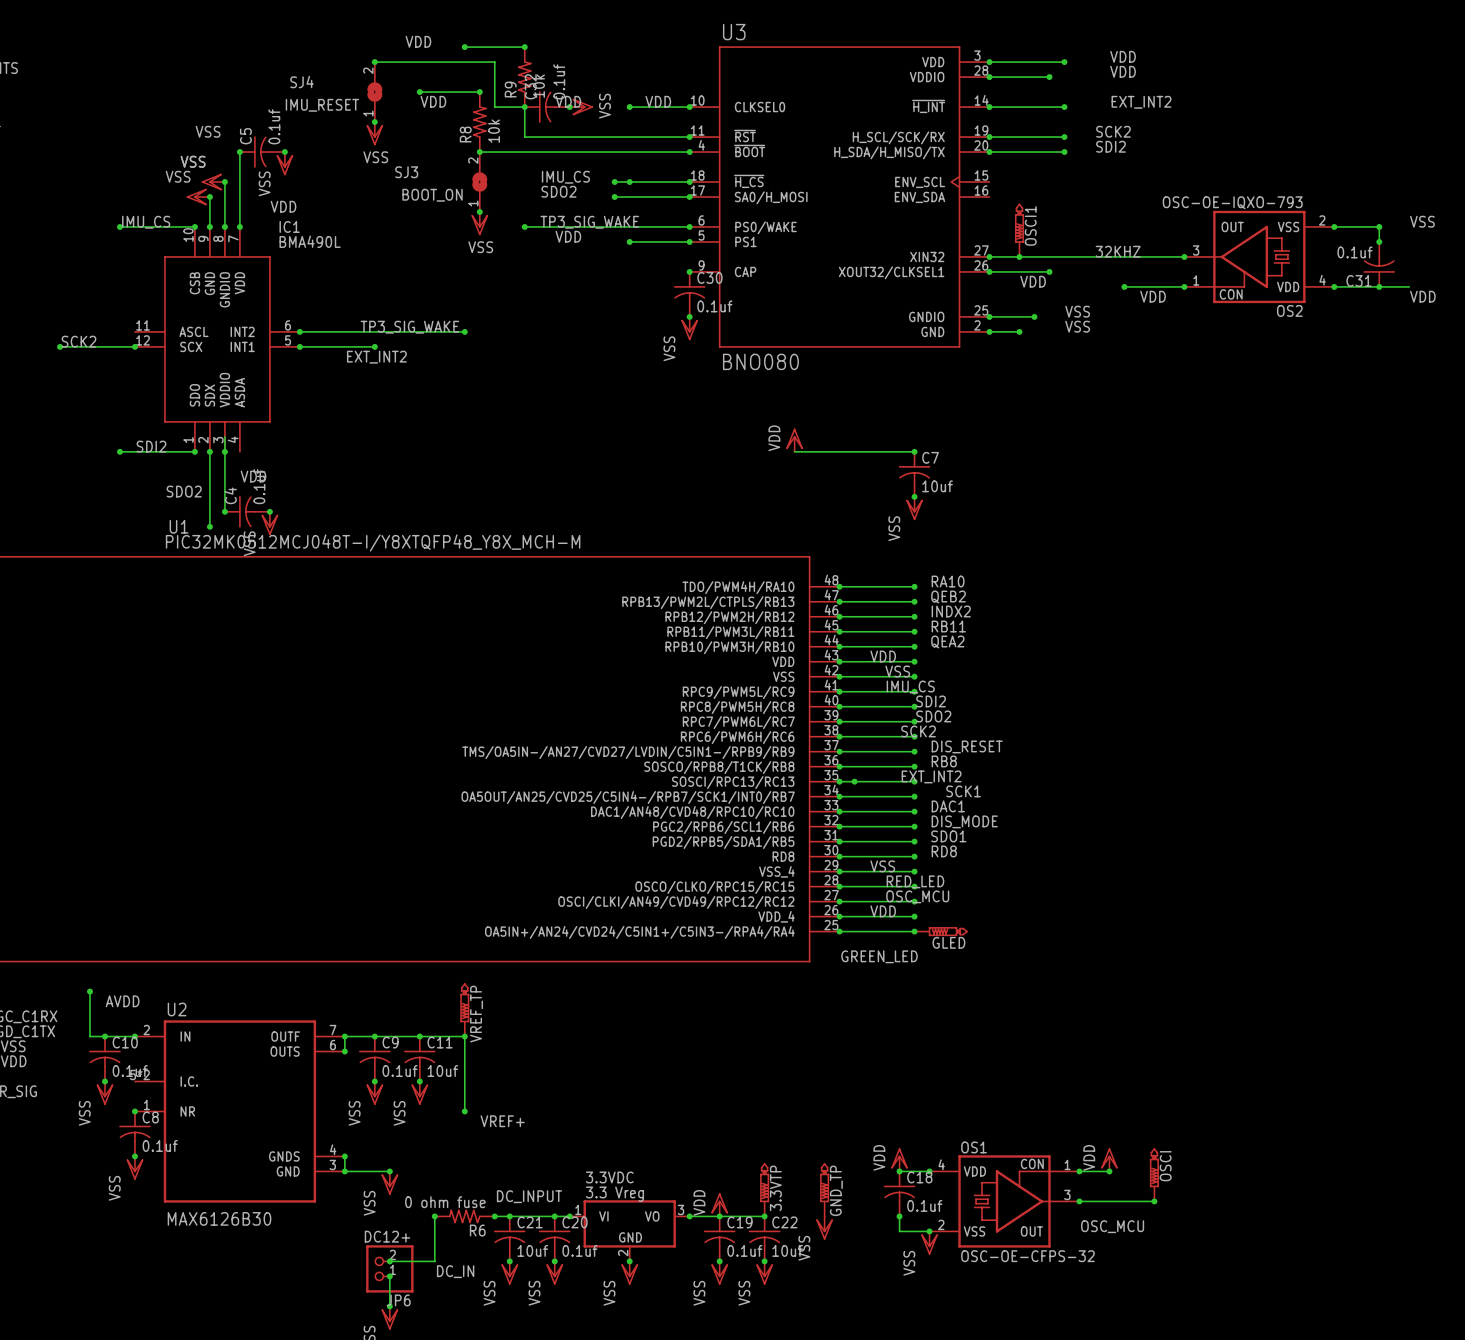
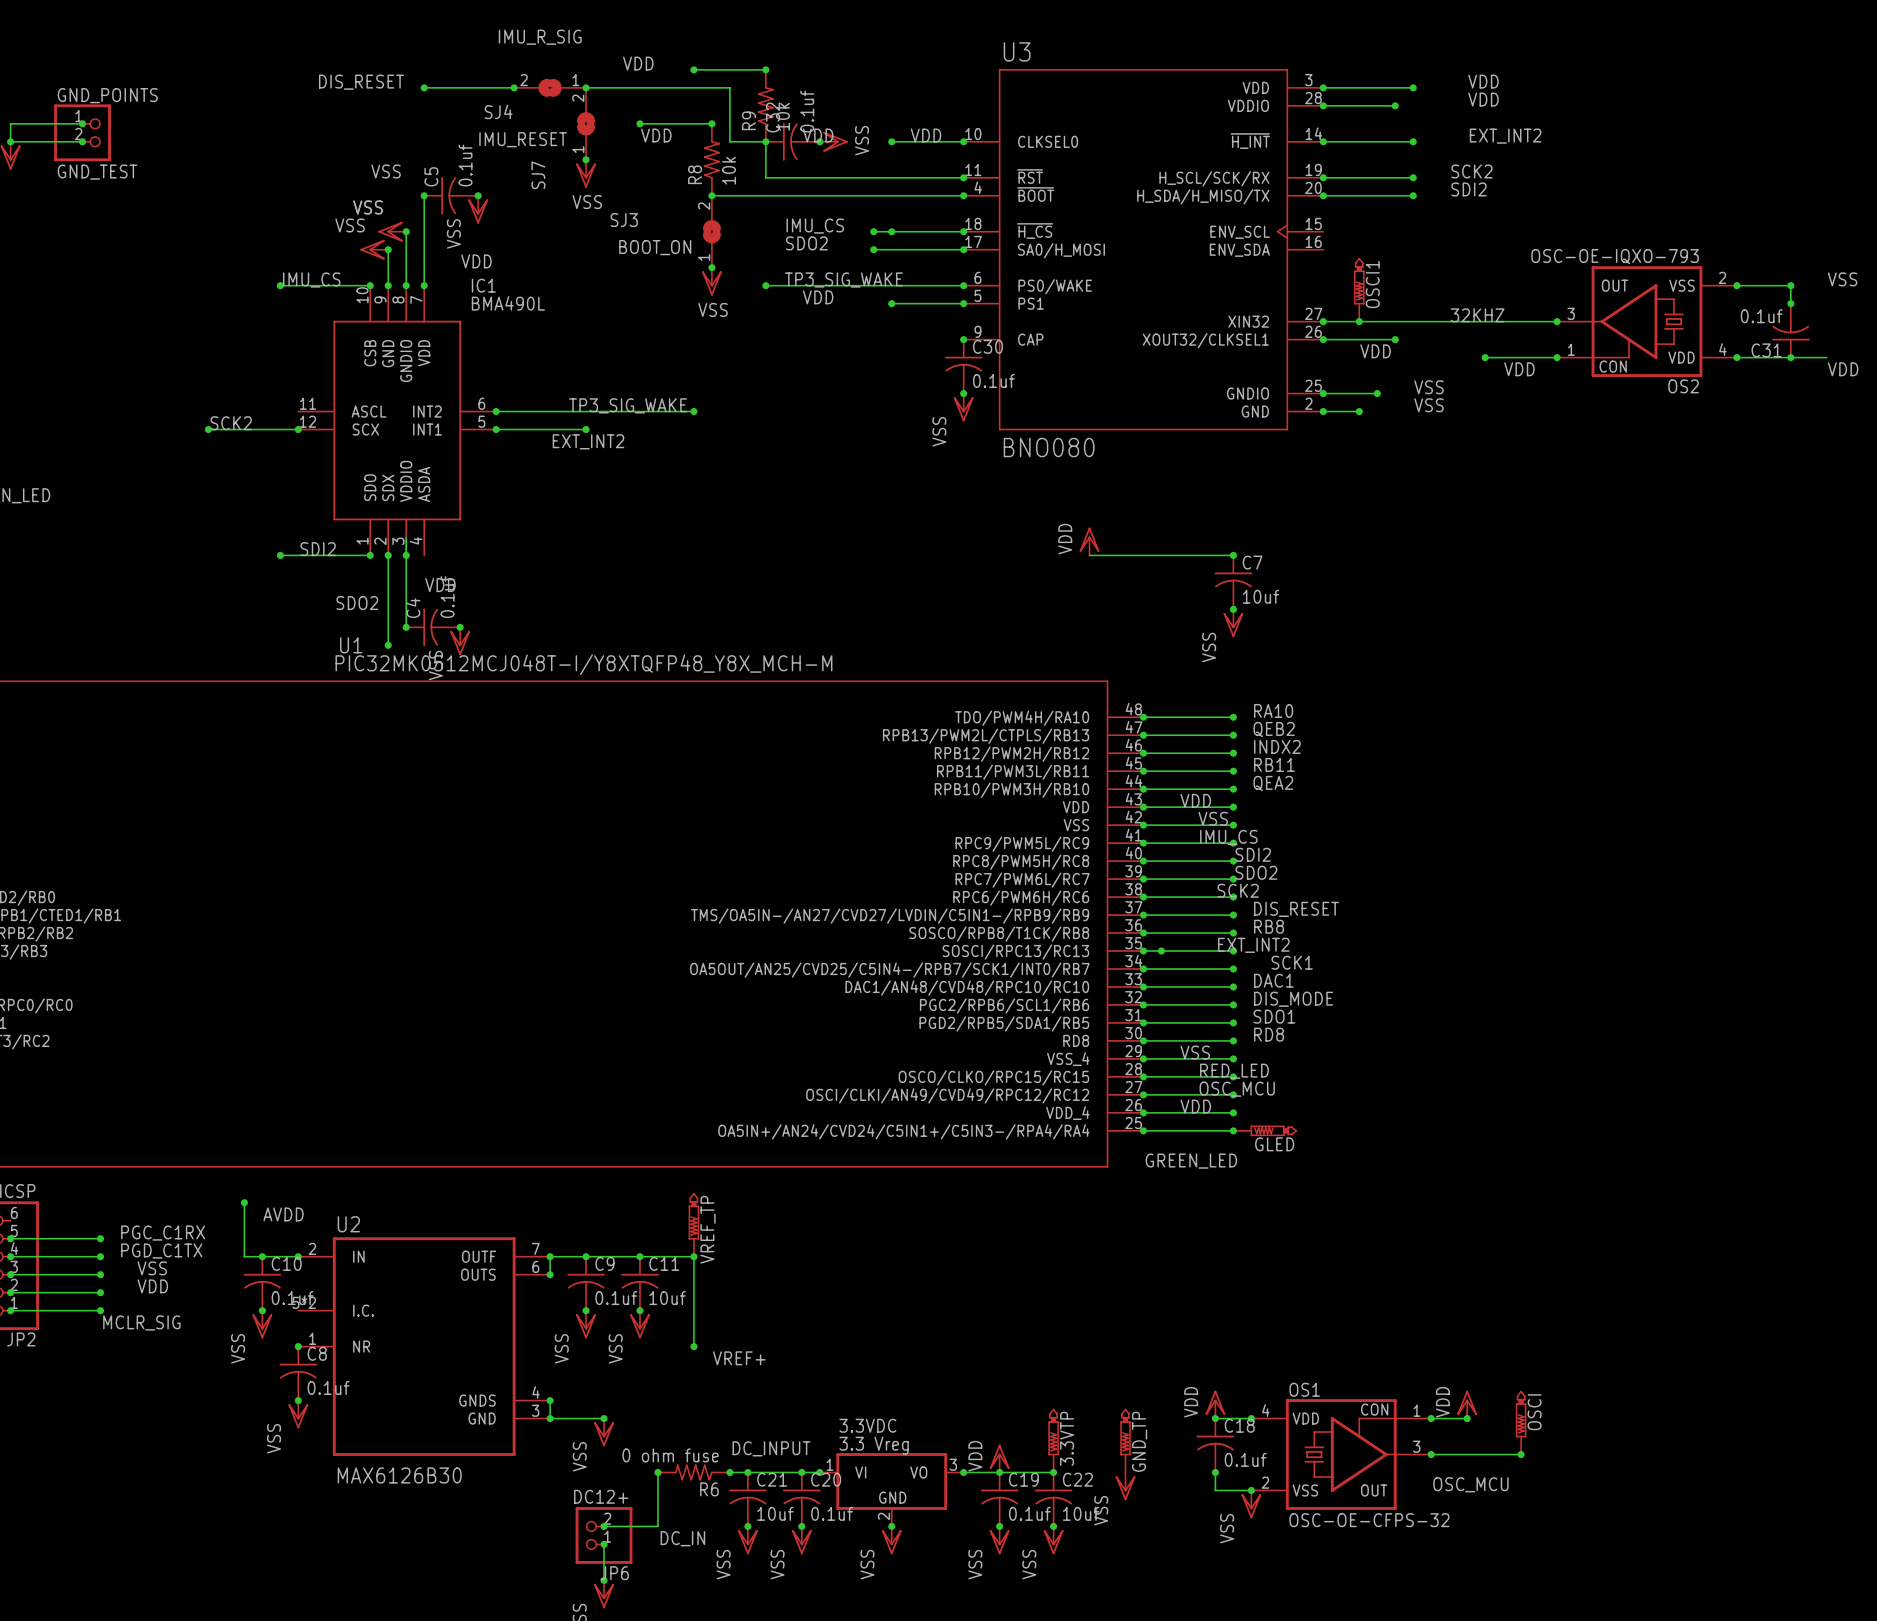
label: none -> DIS_RESET (361, 82)
wire: none -> (424, 87) (514, 87)
junction: none -> (424, 87)
junction: none -> (514, 87)
SJ7: none -> IMU_R_SIG (550, 87)

